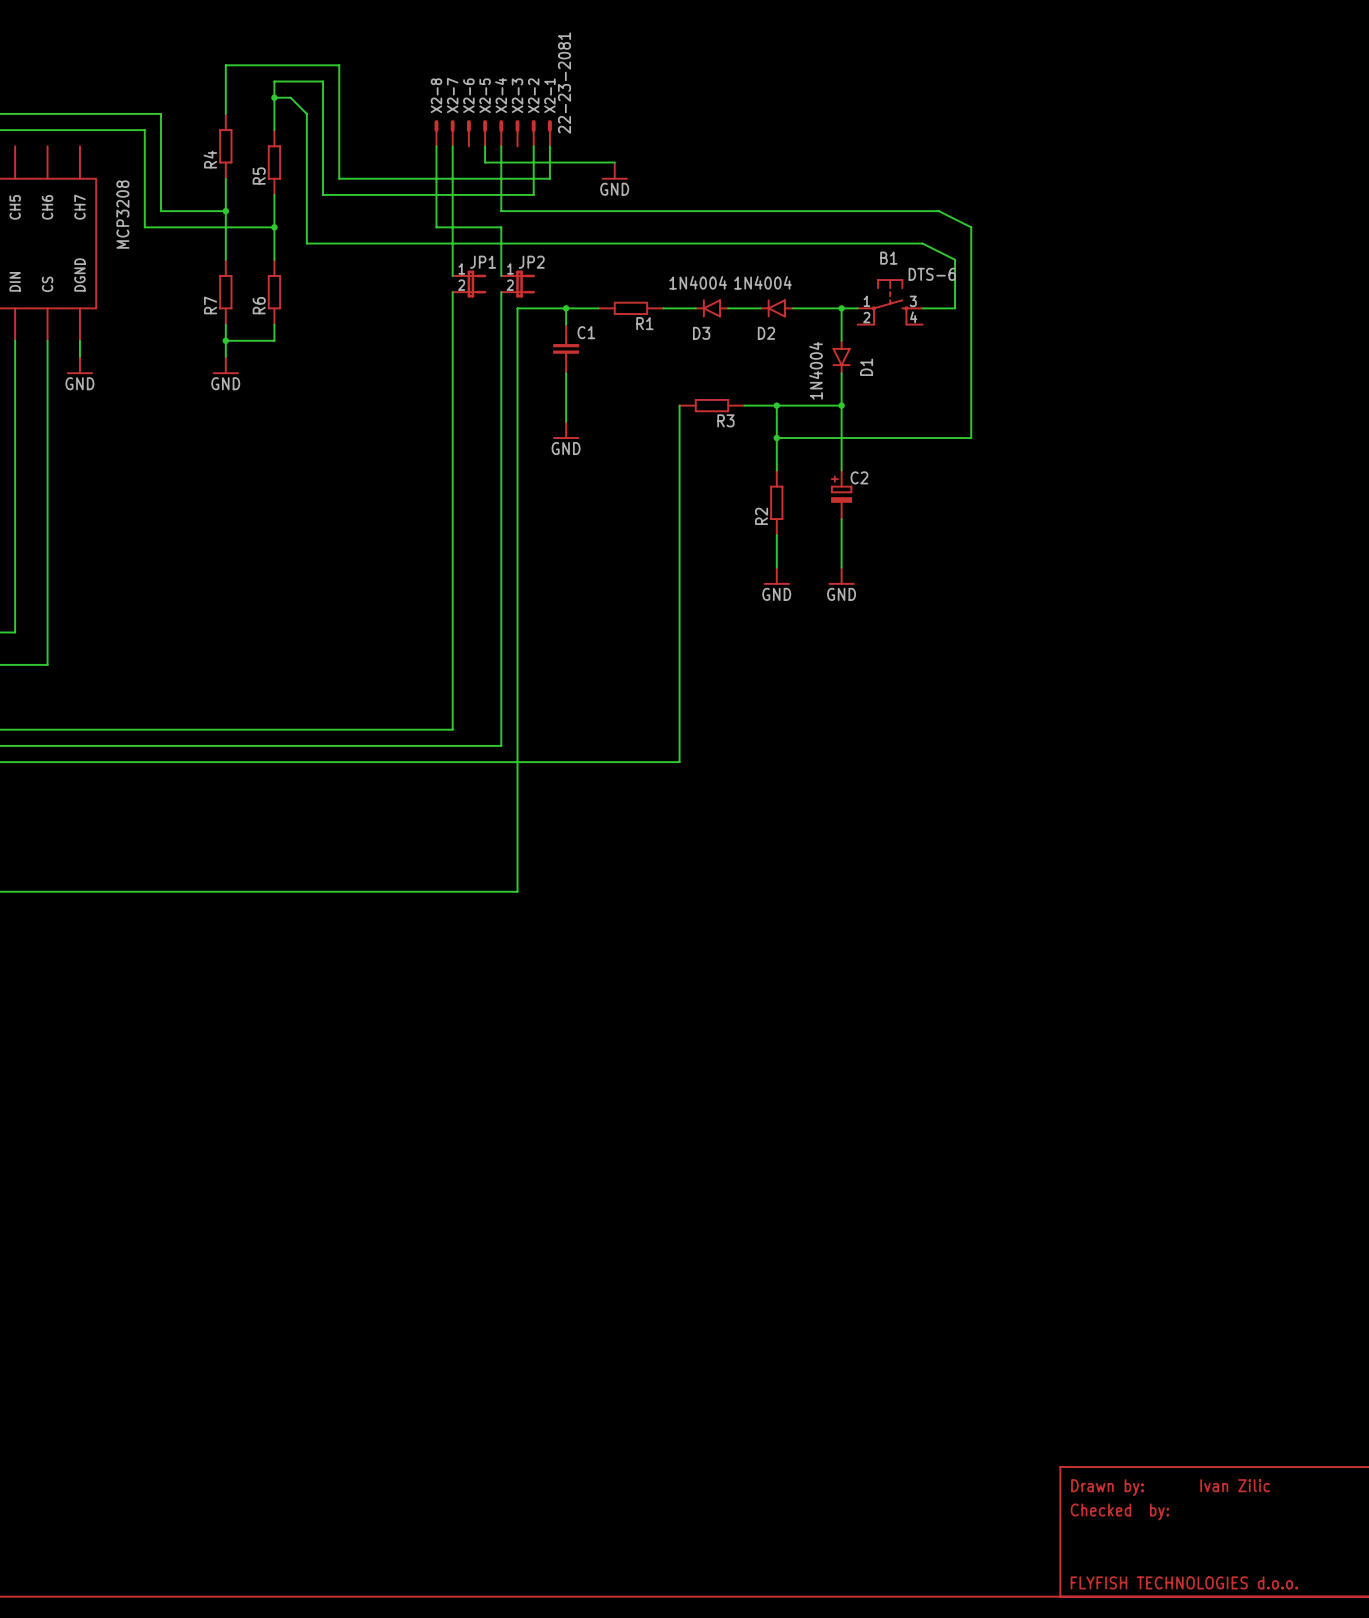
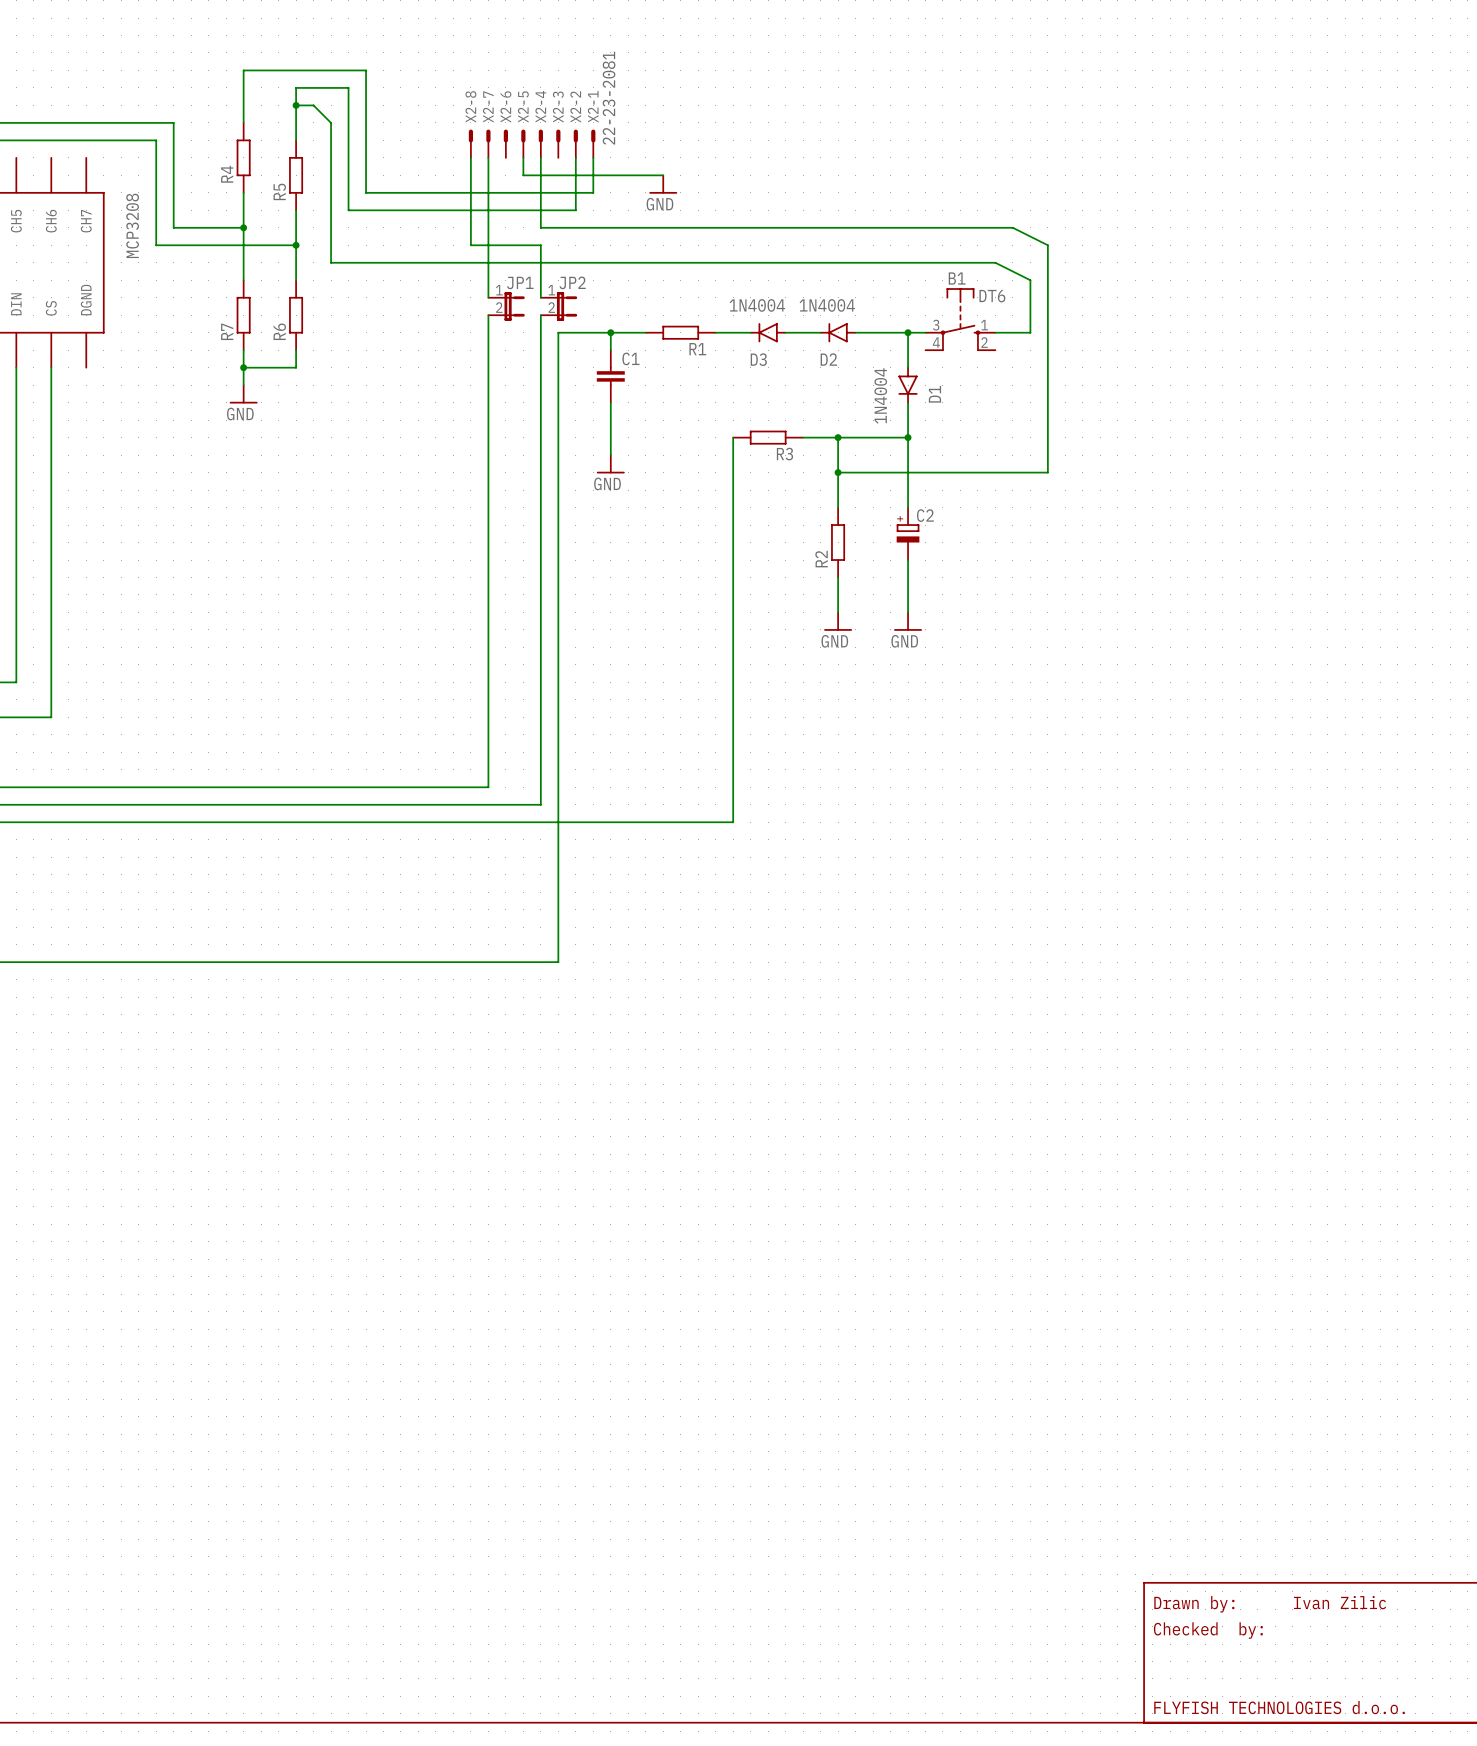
B1 value: DTS-6 (932, 274) -> DT6 (992, 296)
B1 symbol: [857, 279, 923, 326] -> [925, 288, 996, 351]
wire: (79, 340) (79, 356) -> none
power symbol: GND (79, 365) -> none

